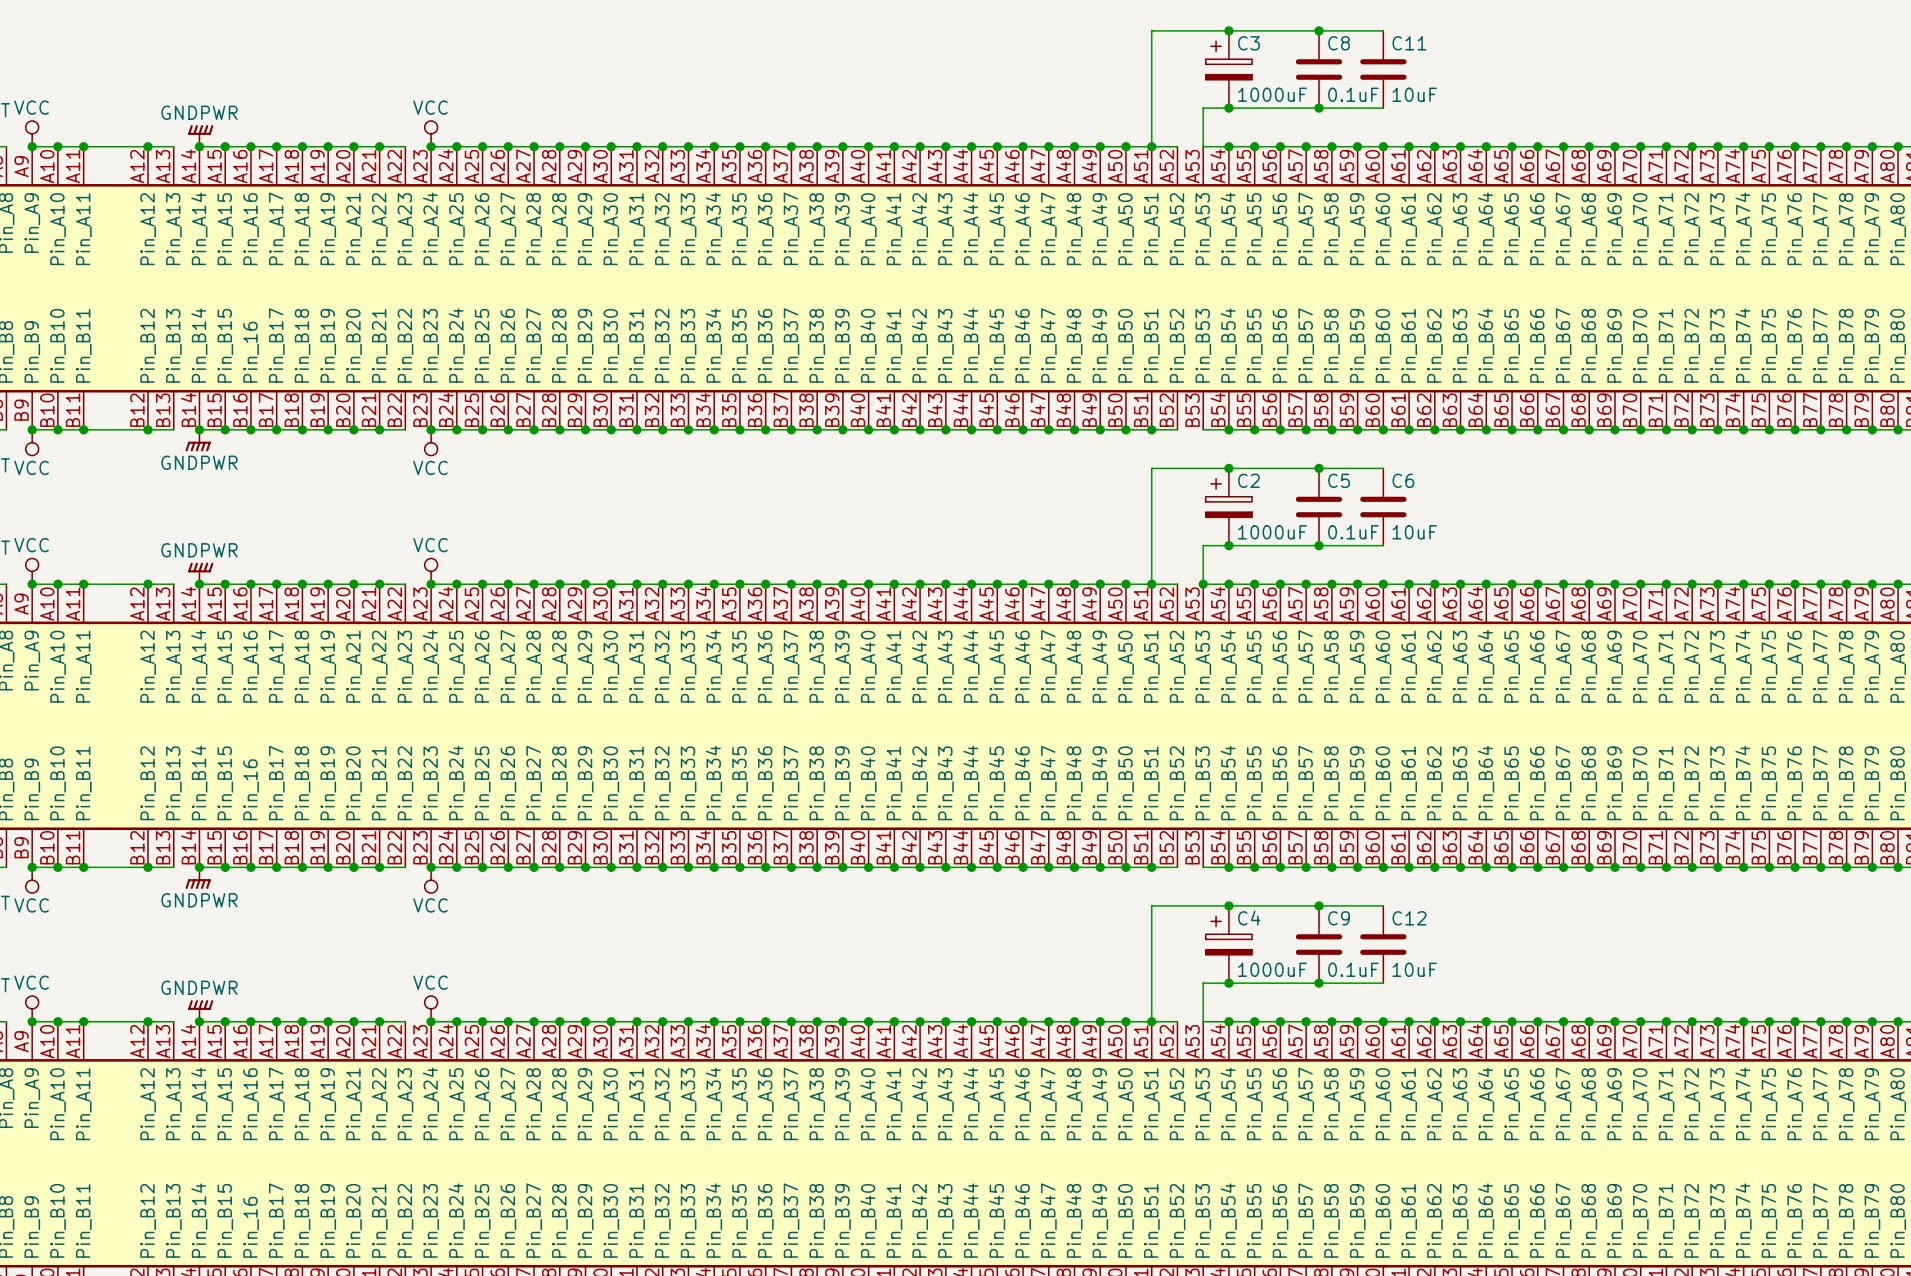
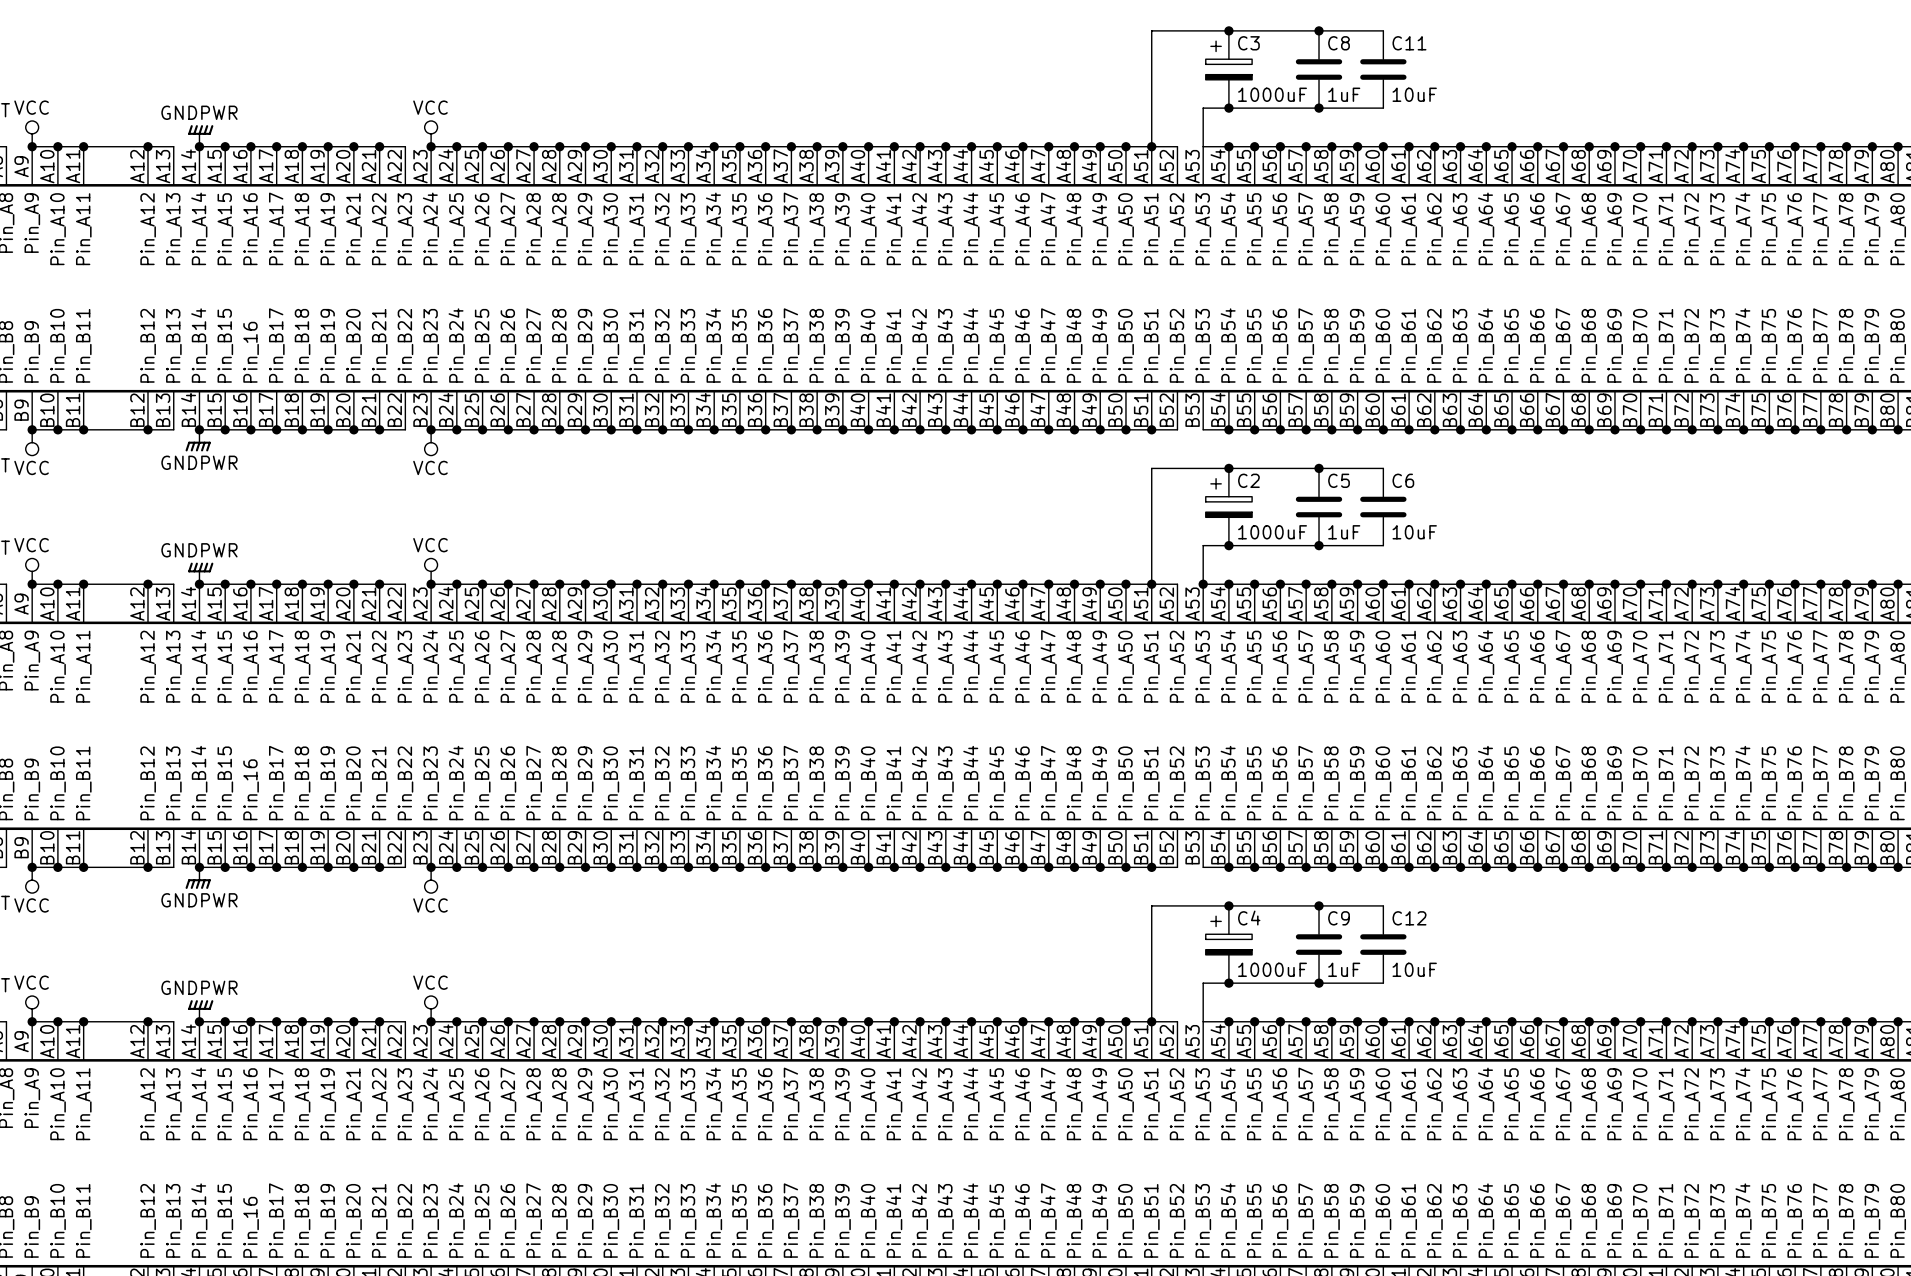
C8 value: 0.1uF (1353, 94) -> 1uF (1344, 94)
C5 value: 0.1uF (1353, 532) -> 1uF (1344, 532)
C9 value: 0.1uF (1353, 969) -> 1uF (1344, 969)

